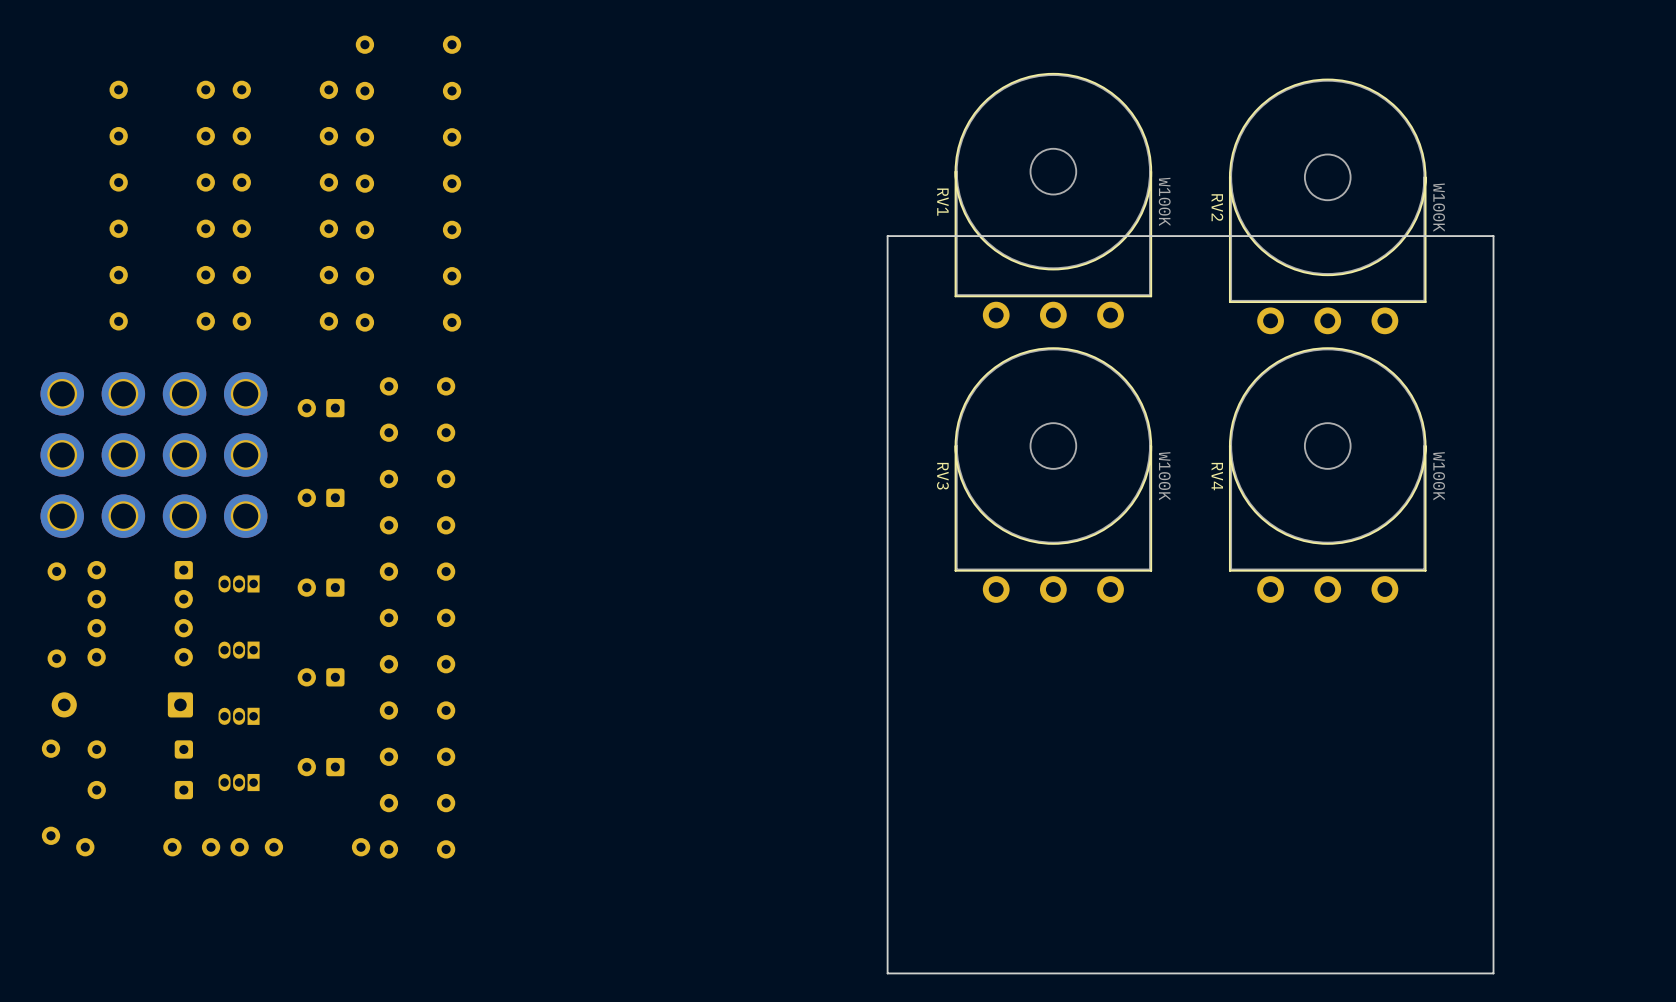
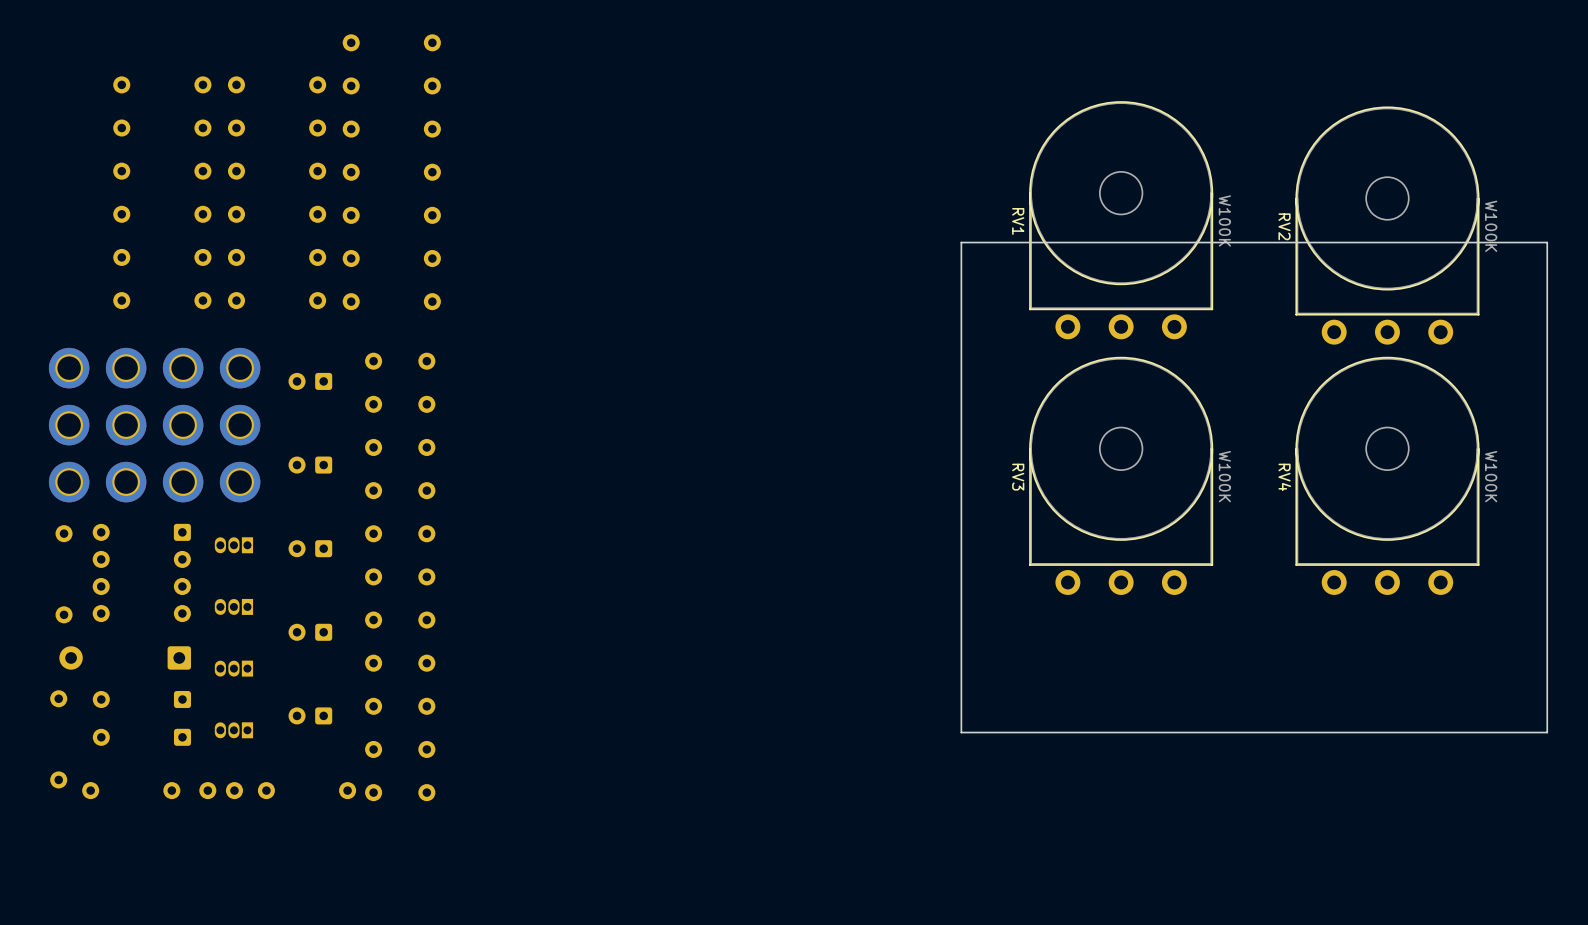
RV1 position: (1053, 200) -> (1121, 220)
RV2 position: (1327, 206) -> (1387, 225)
board edge: (1493, 236) (887, 236) (887, 973) (1493, 973) (1493, 236) -> none
board edge: none -> (1547, 242) (961, 242) (961, 732) (1547, 732) (1547, 242)
RV3 position: (1053, 475) -> (1121, 475)
RV4 position: (1327, 475) -> (1387, 475)

